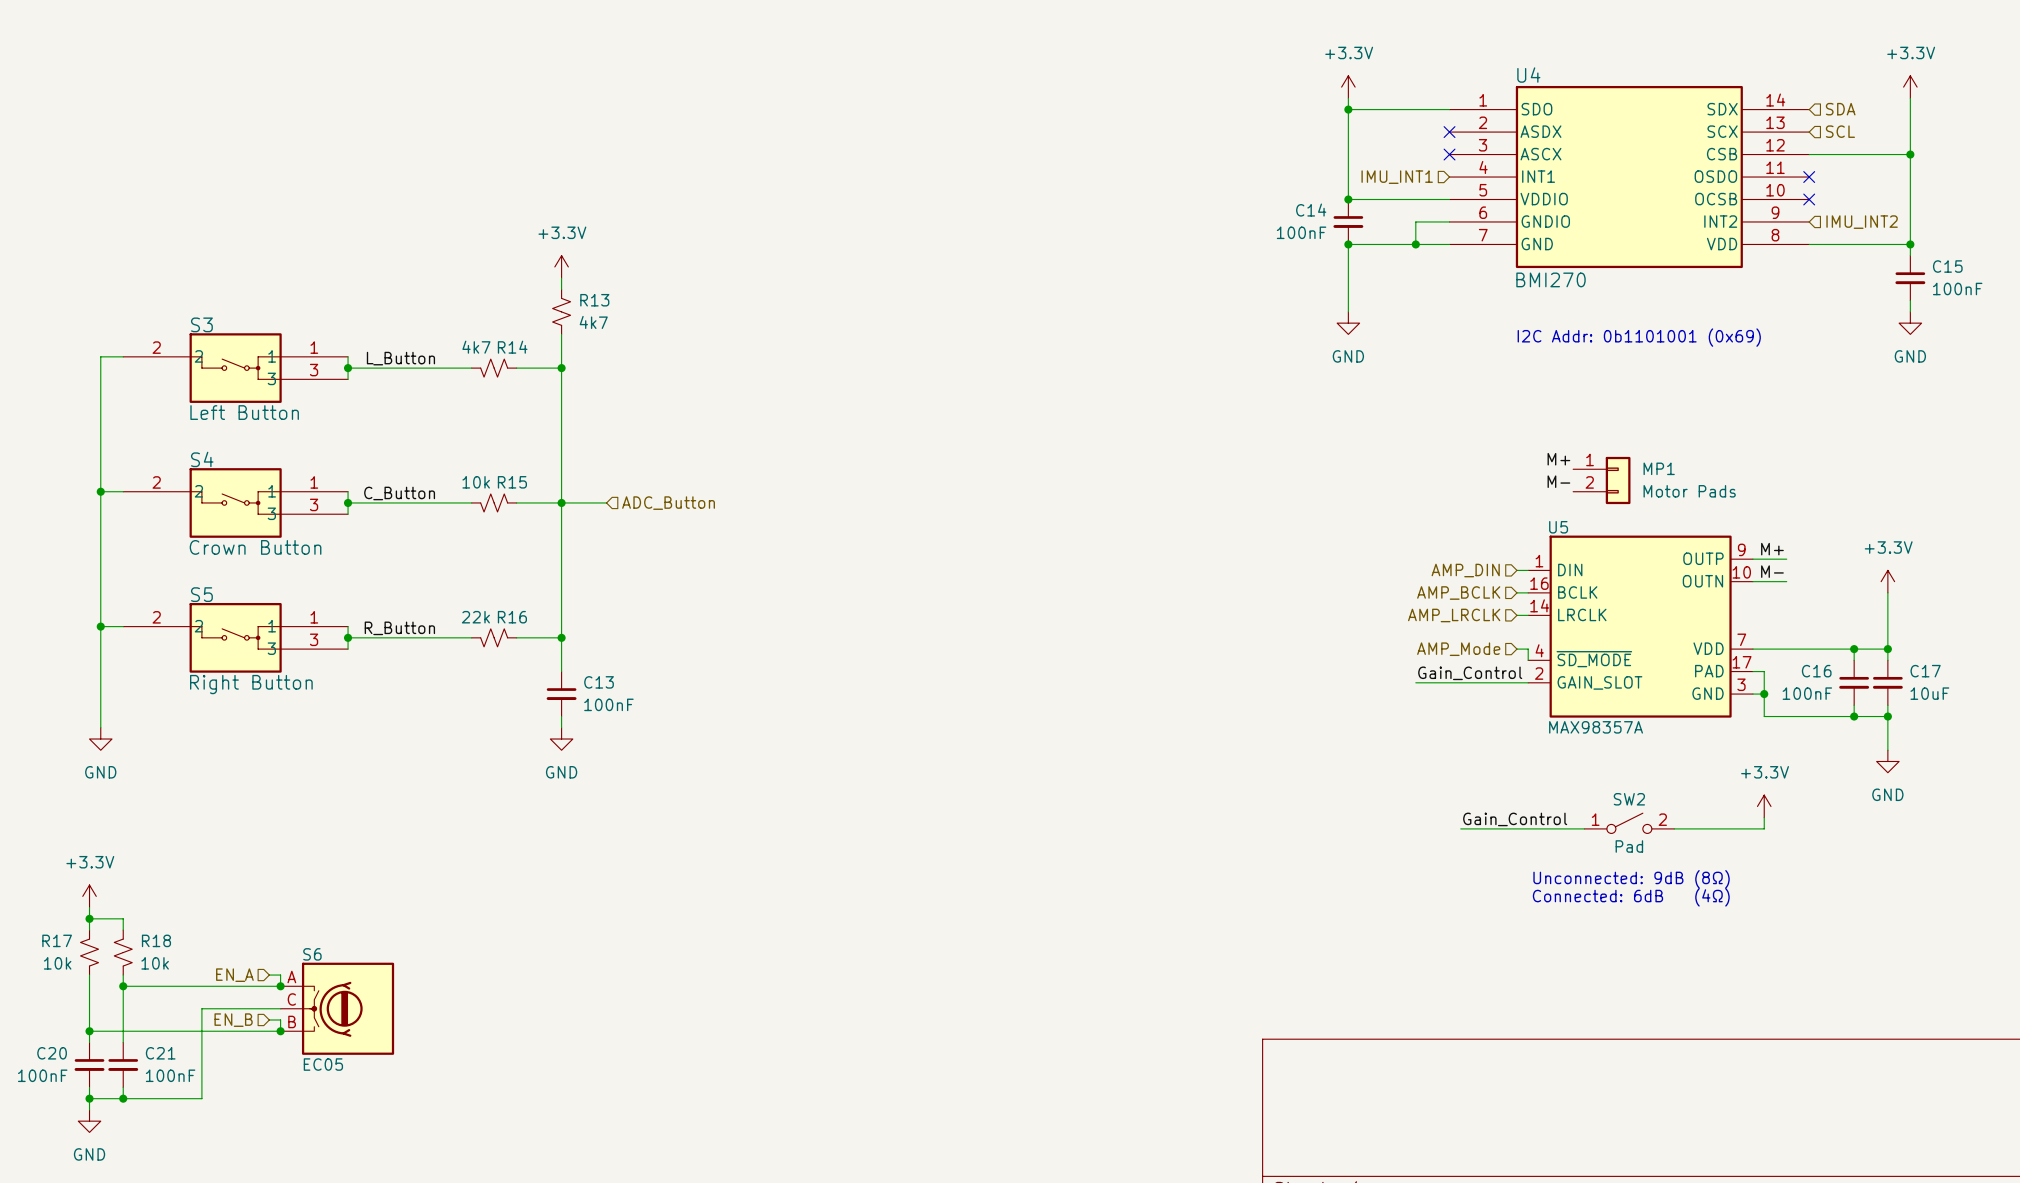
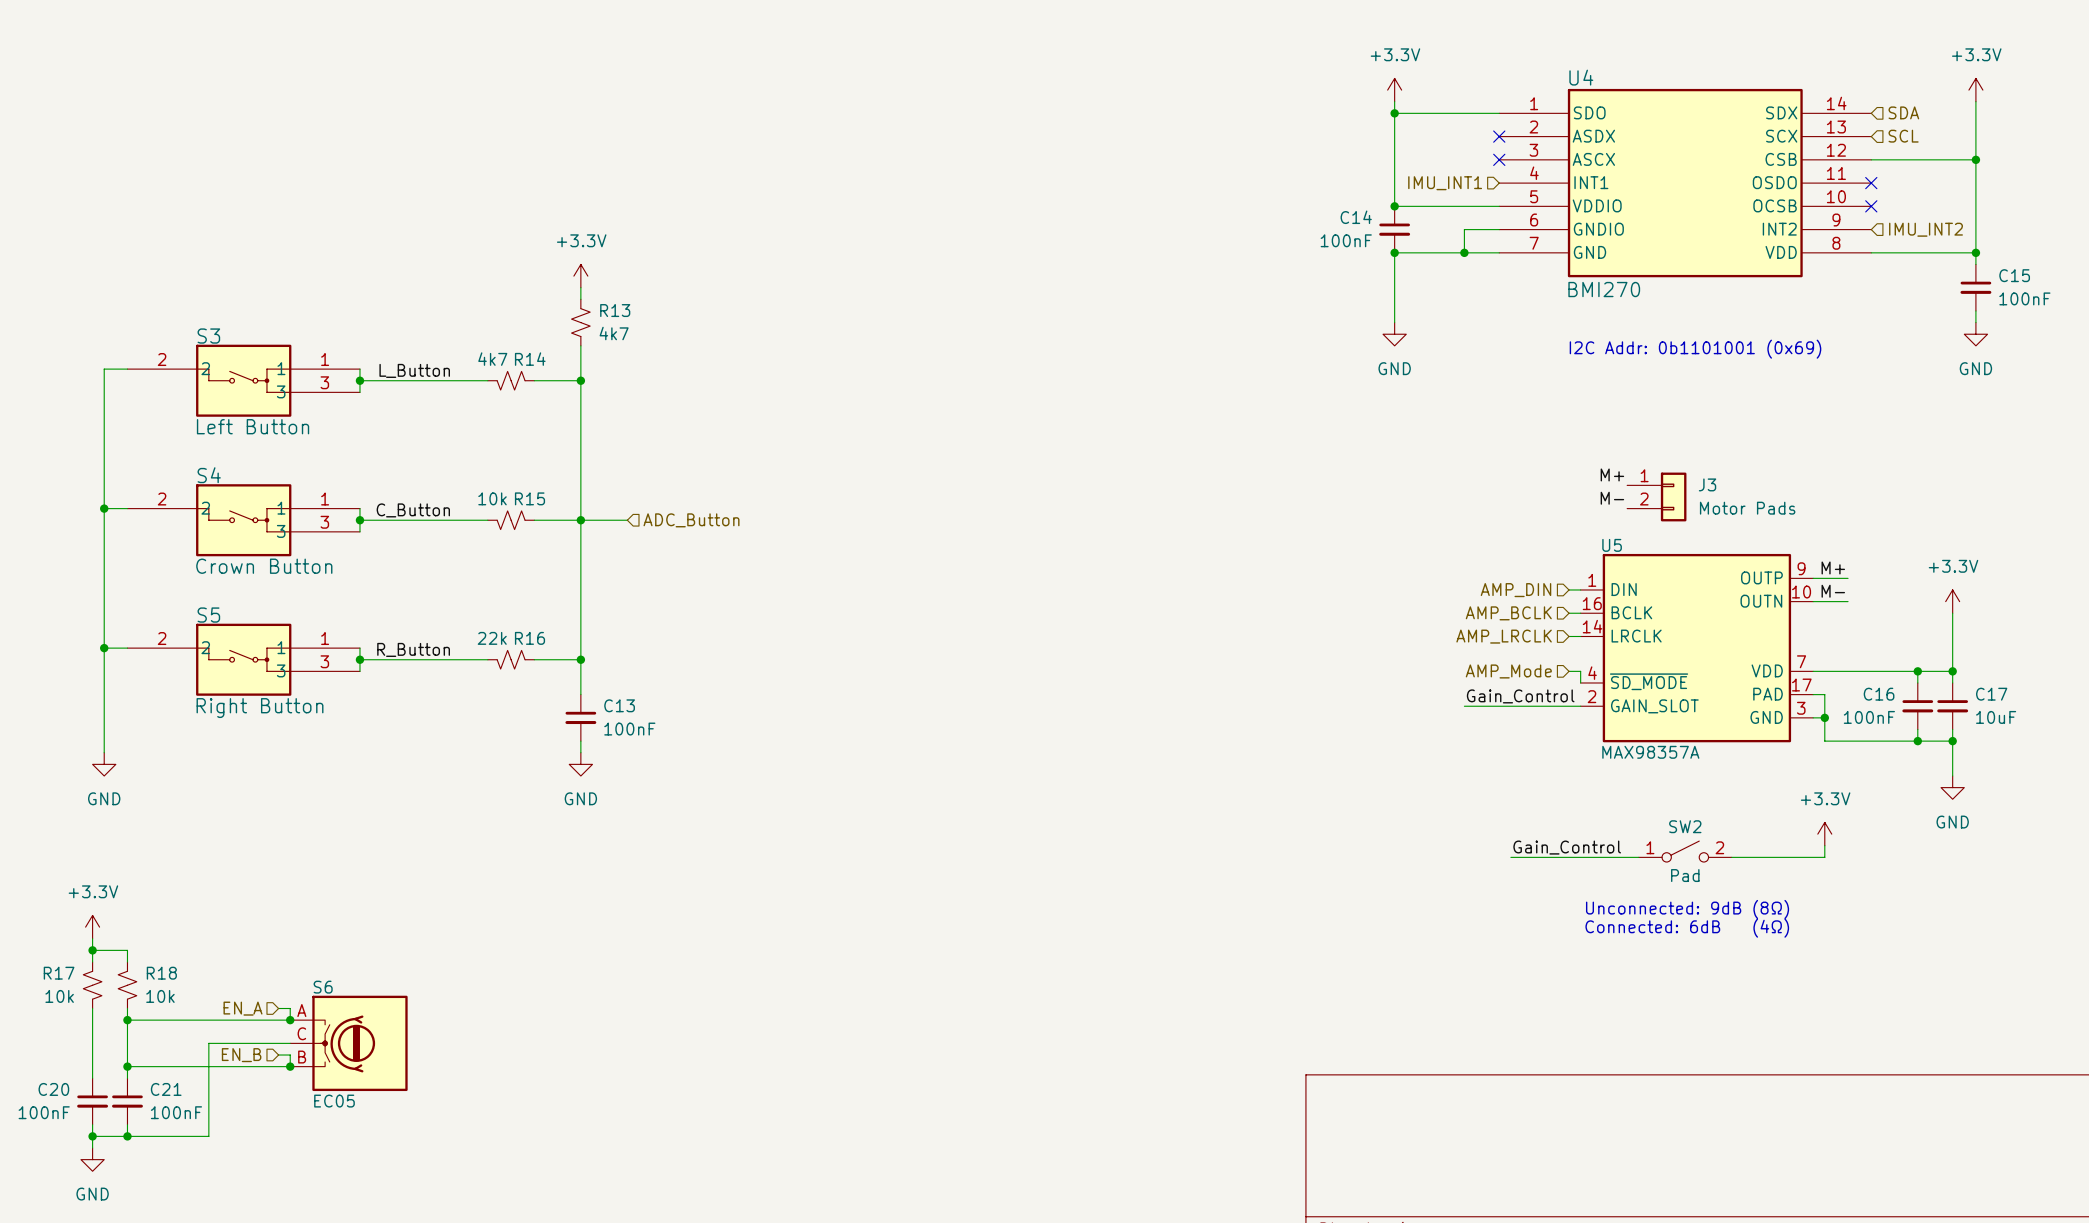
MP1 name: MP1 (1659, 468) -> J3 (1707, 484)
wire: (89, 1031) (123, 1031) -> none
junction position: (89, 1031) -> (127, 1066)

